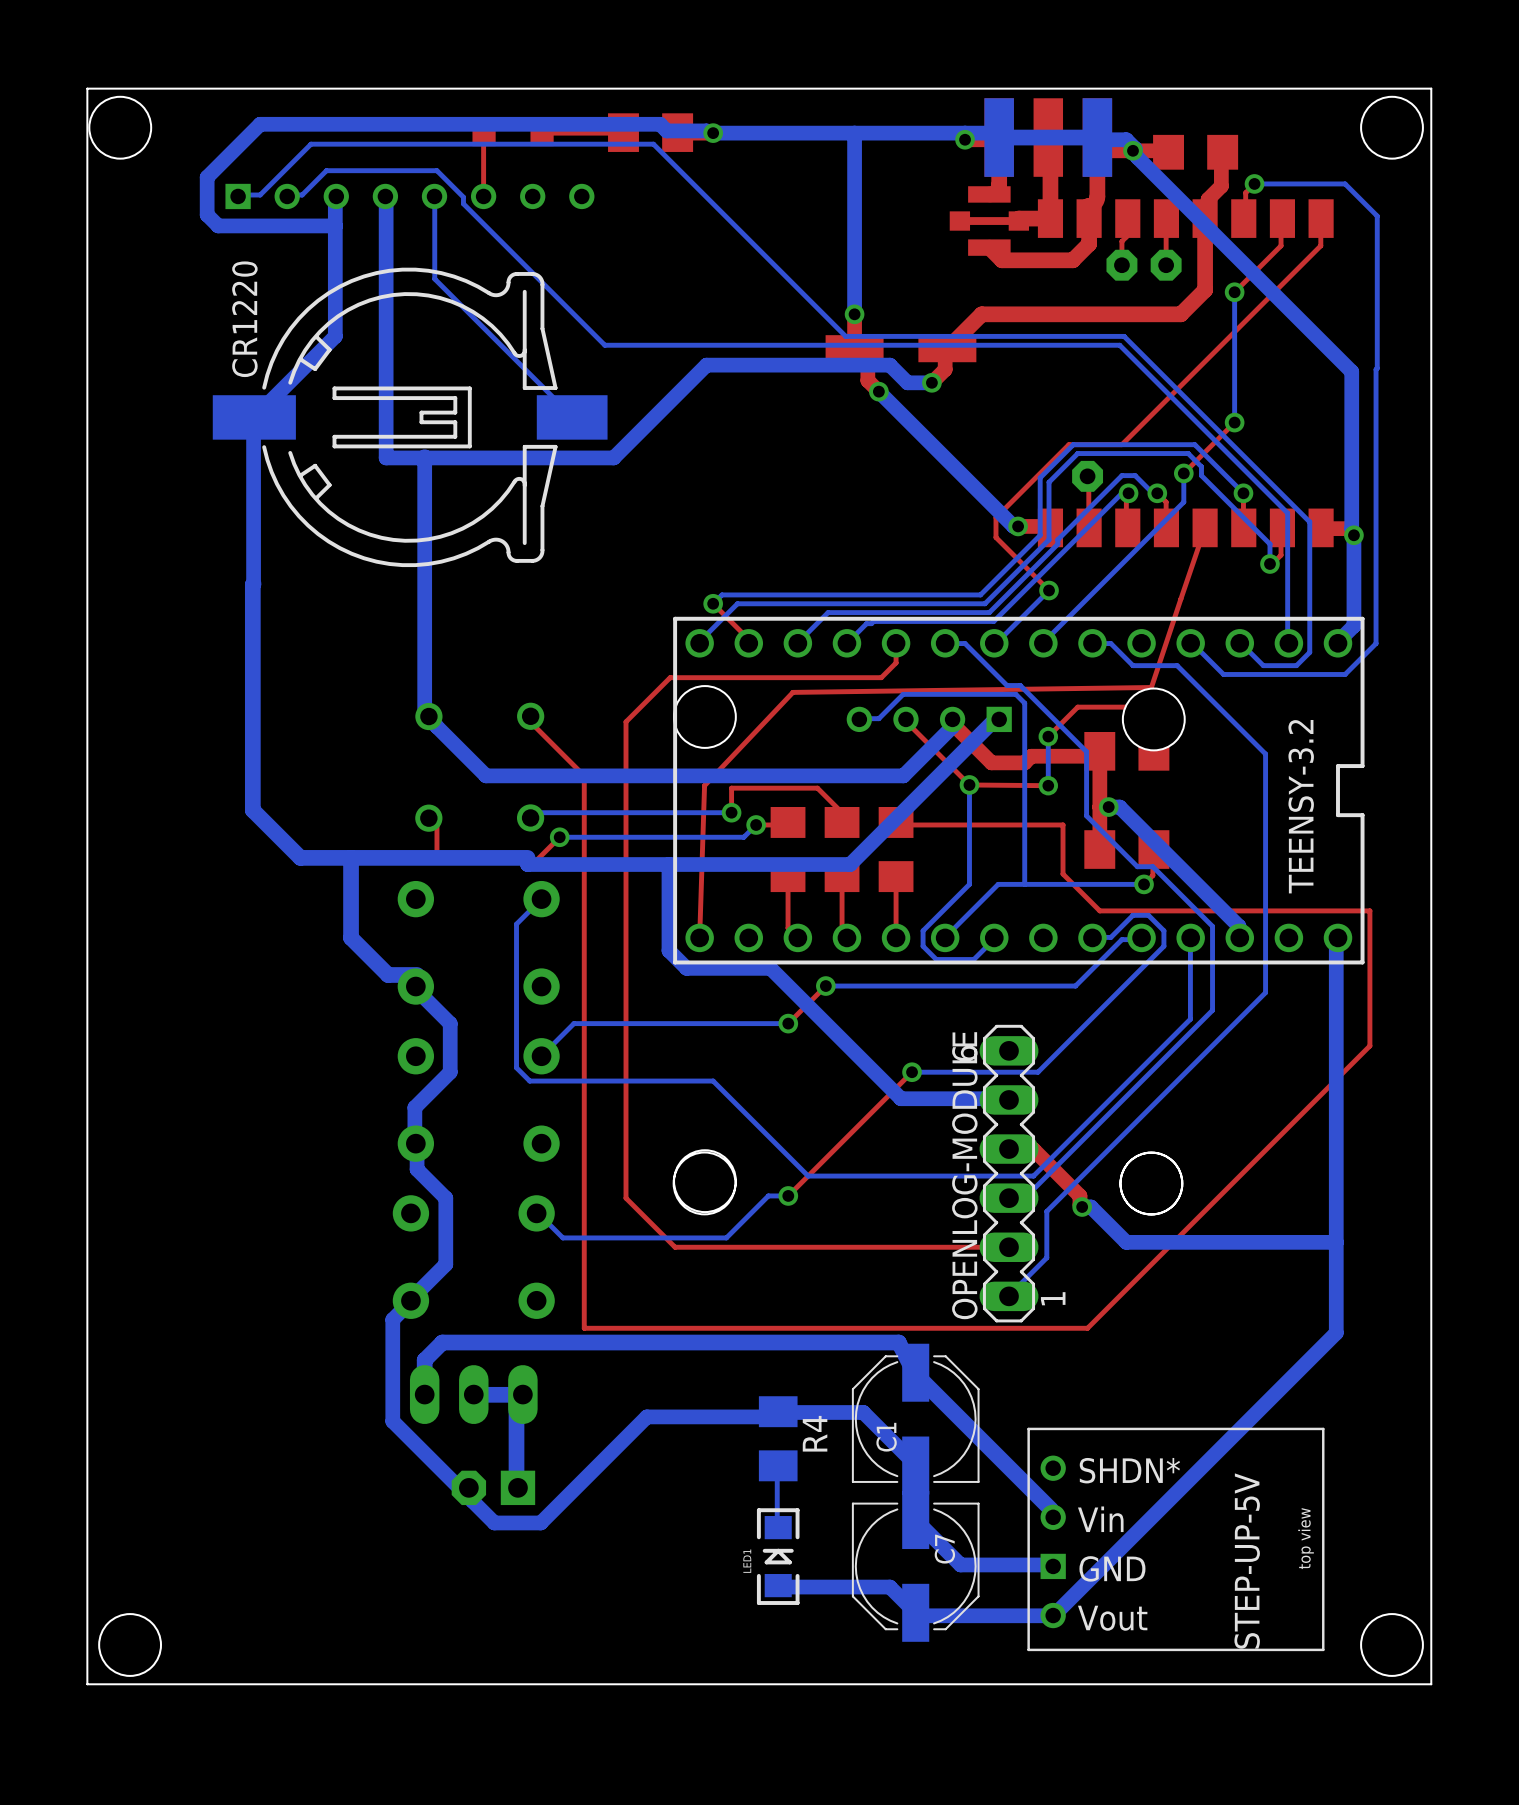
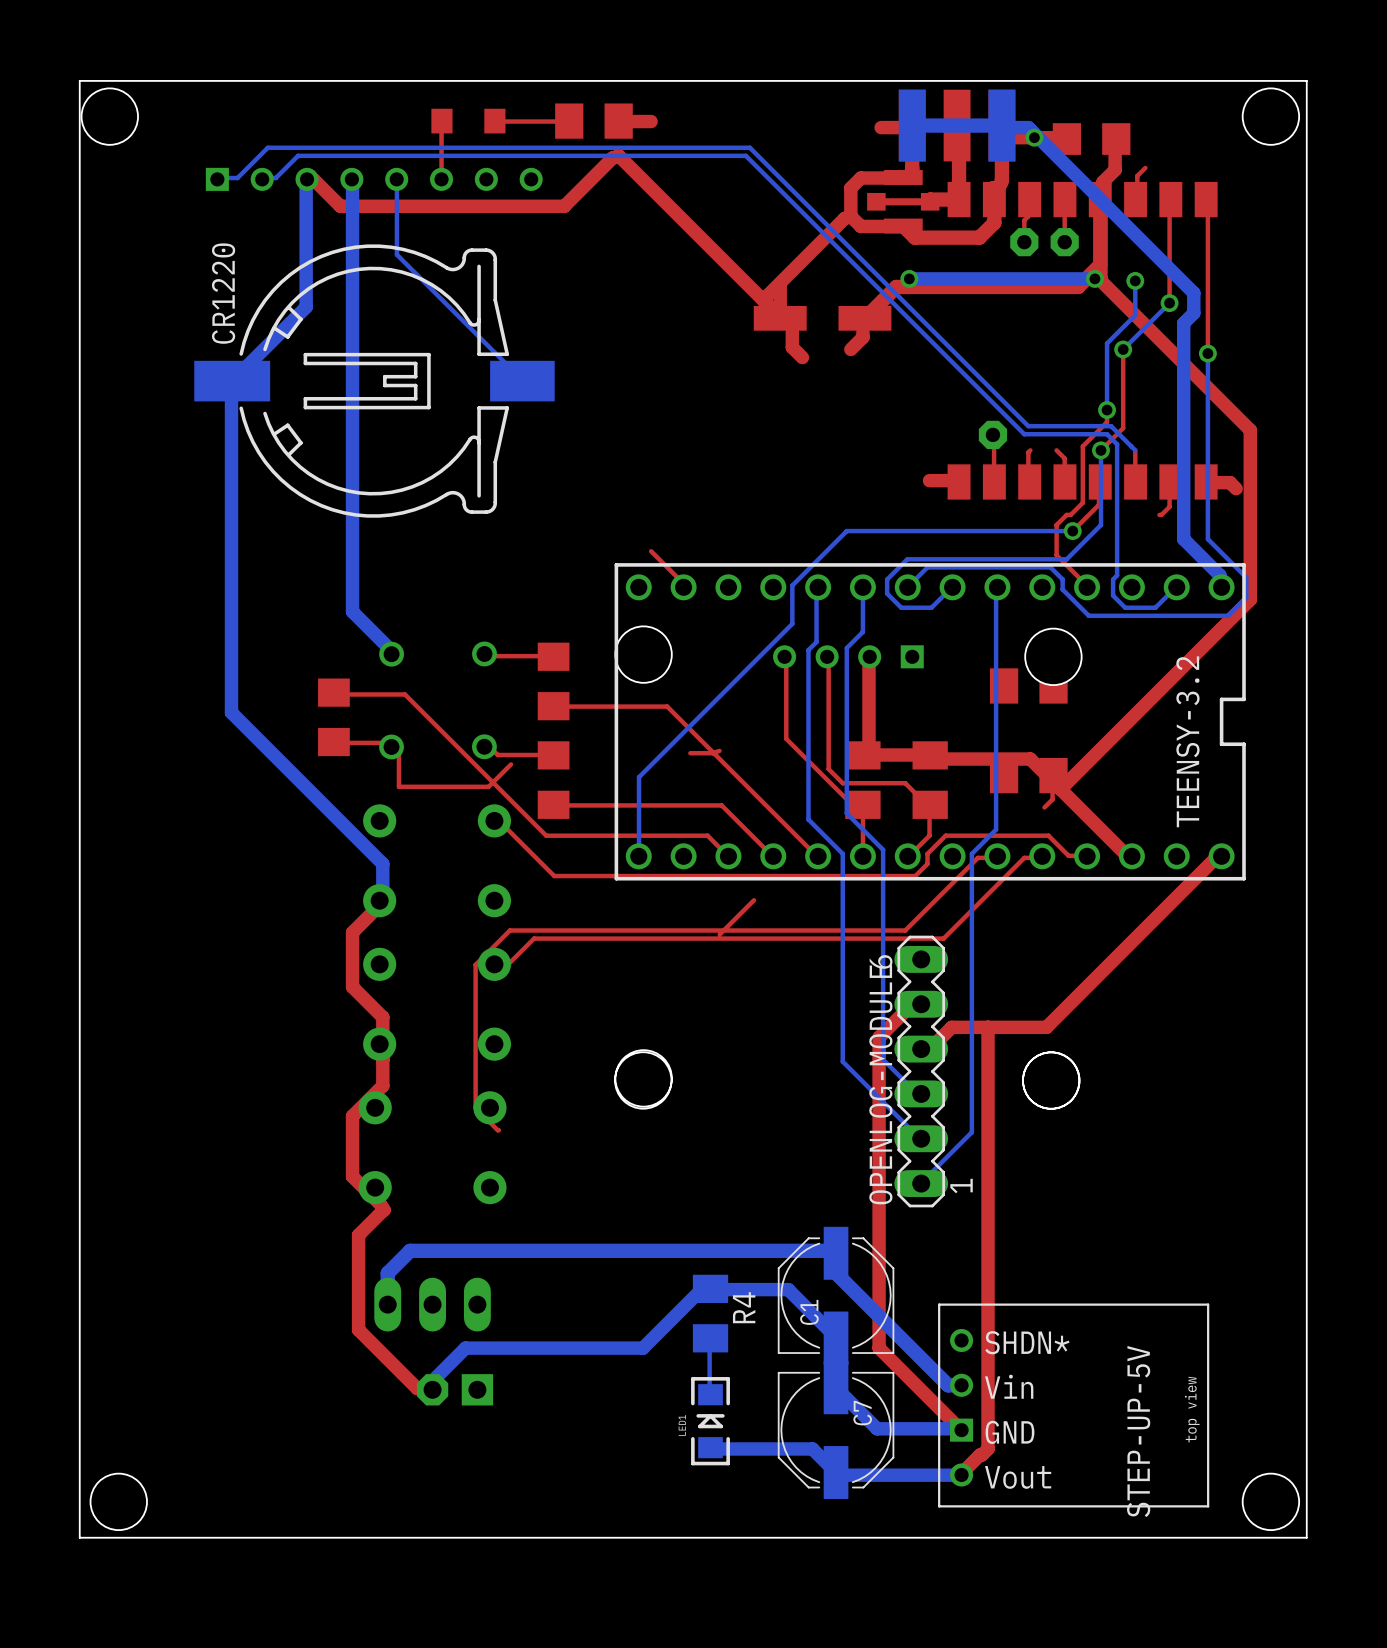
via: (713, 133) -> none
bottom track: (854, 133) (854, 314) -> none
bottom track: (999, 137) (993, 133) (713, 133) (706, 130) (666, 130) (660, 124) (260, 124) (207, 177) (207, 214) (218, 225) (335, 225) -> none
via: (965, 139) -> none
bottom track: (1135, 148) (1135, 150) (1132, 150) (1137, 157) (1351, 371) (1353, 625) (1337, 643) -> (1036, 135) (1193, 293) (1193, 313) (1183, 323) (1183, 539) (1220, 575) (1221, 587)
bottom track: (293, 161) (311, 144) (653, 144) (845, 336) (1124, 336) (1309, 522) (1309, 652) (1296, 665) (1265, 665) -> (267, 147) (749, 147) (1028, 426) (1111, 426)
bottom track: (436, 170) (463, 197) (463, 203) (604, 345) (1119, 345) (1287, 513) (1288, 643) -> (398, 155) (745, 155) (1024, 434)
bottom track: (1254, 183) (1345, 183) (1377, 216) (1376, 643) (1365, 654) -> (1207, 353) (1207, 539) (1246, 577) (1246, 597)
via: (1254, 183) -> none
top track: none -> (903, 177) (860, 178) (850, 188) (850, 216)
top track: none -> (307, 179) (314, 180) (340, 206) (564, 206) (612, 157) (618, 155) (780, 318)
top track: none -> (1100, 199) (1100, 280) (1250, 430) (1250, 599) (1060, 789)
top track: (1321, 218) (1320, 245) (1121, 444) (1068, 444) (995, 517) (995, 537) (1049, 590) -> (1206, 199) (1207, 200) (1207, 353)
top track: none -> (850, 216) (844, 218) (763, 300)
top track: none -> (850, 216) (860, 226) (903, 226)
top track: (1281, 245) (1234, 292) -> (1169, 224) (1169, 303)
bottom track: (1234, 292) (1234, 422) -> none
via position: (1234, 292) -> (1135, 280)
via: none -> (909, 278)
bottom track: none -> (1094, 278) (909, 278)
via: none -> (1094, 278)
bottom track: none -> (1135, 280) (1135, 315) (1107, 343) (1107, 410)
via: (854, 314) -> none
bottom track: none -> (1169, 303) (1123, 349)
via: none -> (1169, 303)
bottom track: (931, 382) (907, 382) (889, 365) (706, 365) (613, 457) (386, 457) -> (396, 654) (352, 611) (352, 418)
via: (931, 382) -> none
top track: none -> (1123, 349) (1123, 428) (1100, 450)
via: none -> (1123, 349)
via: none -> (1207, 353)
bottom track: (878, 391) (1013, 526) (1018, 526) -> none
via: (878, 391) -> none
top track: (1234, 422) (1183, 473) -> none
via: (1234, 422) -> none
top track: none -> (1107, 410) (1107, 422) (1082, 446) (1082, 502) (1056, 525) (1056, 555) (1087, 587)
via: none -> (1107, 410)
bottom track: (424, 456) (424, 714) (428, 716) (486, 775) (903, 775) (952, 726) (952, 719) (951, 720) (951, 727) -> none
bottom track: (1216, 466) (1194, 444) (1073, 444) (1040, 477) (1040, 535) (980, 594) (722, 594) (713, 603) -> none
bottom track: (1183, 473) (1183, 502) (1043, 643) -> (901, 607) (931, 607) (952, 587)
via: (1183, 473) -> none
bottom track: (1121, 475) (1057, 539) (1057, 544) (989, 612) (828, 612) (797, 643) -> none
bottom track: (1135, 475) (1152, 493) (1157, 493) -> none
bottom track: (1128, 493) (1121, 493) (993, 621) (873, 621) (866, 623) (846, 643) -> none
via: (1128, 493) -> none
via: (1157, 493) -> none
via: none -> (1100, 450)
via: (1243, 493) -> none
via: (1018, 526) -> none
top track: (1205, 527) (1151, 687) (792, 692) (704, 785) (699, 937) -> (1100, 481) (1098, 504) (1072, 531)
via: (1353, 535) -> none
bottom track: (1269, 564) (1269, 544) (1201, 475) (1201, 466) (1188, 453) (1077, 453) (1049, 482) (1049, 539) (984, 603) (737, 603) (699, 643) -> none
via: (1269, 564) -> none
bottom track: none -> (1072, 531) (846, 531) (792, 585) (792, 623) (639, 777) (638, 856)
via: none -> (1072, 531)
bottom track: (253, 583) (252, 810) (300, 857) (527, 857) (527, 864) (850, 864) (993, 720) (999, 719) -> (231, 533) (231, 712) (382, 863) (384, 900)
bottom track: (1049, 590) (994, 643) -> (1117, 615) (1088, 615) (1062, 589) (1062, 579) (1050, 567) (927, 567) (907, 587)
via: (1049, 590) -> none
via: (713, 603) -> none
top track: (896, 643) (896, 662) (881, 677) (670, 677) (626, 721) (626, 1198) (675, 1247) (1009, 1247) -> none
bottom track: (945, 643) (965, 643) (971, 650) -> (1100, 450) (1100, 525) (1066, 559) (907, 559) (887, 579) (887, 593)
bottom track: (1092, 643) (1110, 643) (1132, 665) (1177, 665) (1265, 754) (1265, 992) (1046, 1211) (1046, 1257) -> (997, 587) (996, 829) (971, 853) (971, 1132) (955, 1148)
bottom track: (1190, 643) (1223, 674) -> none
bottom track: (1239, 643) (1263, 665) -> (1036, 434) (1107, 434) (1117, 444) (1117, 575) (1113, 579) (1113, 595) (1125, 607) (1153, 607)
bottom track: none -> (1176, 587) (1155, 607)
bottom track: (987, 665) (1007, 685) (1020, 685) (1086, 751) (1086, 815) (1137, 866) (1152, 866) (1212, 926) (1212, 1010) (1024, 1198) (1009, 1198) -> (862, 587) (862, 631) (846, 648) (846, 813) (883, 849) (883, 1059) (917, 1093) (921, 1093)
bottom track: (894, 703) (903, 694) (1015, 694) (1024, 703) (1024, 884) -> (816, 642) (816, 587) (818, 587)
bottom track: (885, 712) (878, 718) (859, 719) -> none
top track: (530, 716) (535, 726) (584, 775) (584, 1328) (1087, 1328) (1369, 1045) (1369, 910) (1099, 910) (1063, 874) (1063, 824) (903, 824) (896, 822) -> none
top track: none -> (488, 653) (491, 656) (553, 656)
top track: none -> (784, 656) (786, 658) (786, 738) (852, 805) (862, 804) (862, 856)
top track: (952, 719) (954, 725) (991, 762) (1024, 762) (1031, 756) (1093, 756) (1099, 751) (1099, 849) -> (869, 656) (868, 748) (862, 755) (929, 755) (935, 759) (1030, 759) (1127, 855) (1131, 856)
top track: (907, 720) (969, 784) (1048, 785) -> (828, 658) (828, 769) (842, 783) (905, 783) (927, 805) (930, 804) (929, 835) (907, 856)
top track: (1048, 736) (1077, 707) (1136, 707) (1151, 721) (1151, 748) (1153, 751) -> none
bottom track: (1048, 736) (1048, 785) -> none
via: (1048, 736) -> none
part: none -> (553, 681)
bottom track: (969, 784) (969, 884) (923, 930) (923, 935) -> (808, 650) (808, 819) (842, 853)
via: (969, 784) -> none
part: none -> (333, 717)
via: (1048, 785) -> none
bottom track: (1108, 807) (1119, 807) (1239, 926) (1239, 937) -> none
via: (1108, 807) -> none
top track: none -> (333, 742) (390, 742) (396, 746)
top track: (731, 812) (731, 788) (817, 788) (842, 812) (842, 822) -> none
bottom track: (731, 812) (535, 812) (530, 817) -> none
via: (731, 812) -> none
top track: none -> (488, 746) (497, 755) (553, 755)
bottom track: (756, 824) (743, 837) (559, 837) -> none
via: (756, 824) -> none
via: (559, 837) -> none
part: (788, 849) -> none
part: (842, 849) -> none
part: (896, 849) -> none
part: none -> (553, 780)
part: none -> (862, 780)
part: none -> (930, 780)
bottom track: (351, 857) (351, 937) (388, 974) (417, 974) (415, 986) (419, 992) (450, 1023) (450, 1072) (414, 1107) (417, 1169) (445, 1198) (445, 1264) (392, 1319) (392, 1421) (459, 1487) (468, 1487) (472, 1494) (472, 1500) (494, 1522) (540, 1522) (646, 1416) (772, 1416) (778, 1411) -> (432, 1389) (433, 1380) (465, 1348) (643, 1348) (703, 1287) (710, 1288)
bottom track: (668, 864) (668, 950) (686, 968) (770, 968) (900, 1098) (1009, 1099) -> none
top track: (788, 876) (788, 928) (797, 937) -> (333, 692) (334, 694) (405, 694) (546, 835) (707, 835) (728, 856)
top track: (842, 876) (842, 933) (846, 937) -> (553, 804) (721, 805) (773, 856)
top track: (896, 876) (896, 937) -> (553, 706) (667, 706) (818, 856)
bottom track: (1144, 884) (998, 884) (945, 937) -> none
via: (1144, 884) -> none
bottom track: (541, 899) (516, 924) (516, 1067) (529, 1081) (713, 1081) (808, 1176) (1033, 1176) (1190, 1019) (1190, 937) -> none
top track: none -> (498, 820) (554, 876) (915, 876) (927, 863) (927, 853) (945, 835) (1048, 835) (1068, 855) (1087, 856)
bottom track: (994, 937) (973, 959) (936, 959) (923, 946) -> (921, 1138) (842, 1061) (842, 863)
top track: none -> (997, 856) (977, 857) (905, 930) (509, 930) (475, 964) (475, 1108) (498, 1130)
bottom track: (1092, 937) (1110, 937) (1132, 915) (1148, 915) (1163, 930) (1163, 946) (1037, 1072) (912, 1072) -> none
top track: none -> (1042, 856) (1024, 857) (943, 938) (534, 938) (498, 973)
bottom track: (1141, 937) (1139, 939) (1121, 939) (1075, 986) (825, 986) -> none
bottom track: (1337, 937) (1336, 939) (1336, 1332) (1053, 1615) -> none
top track: none -> (384, 900) (352, 932) (352, 987) (382, 1017) (384, 1053) (382, 1085) (352, 1116) (352, 1176) (384, 1210) (358, 1235) (358, 1329) (417, 1388) (432, 1389)
via: (825, 986) -> none
bottom track: (788, 1023) (573, 1023) (541, 1056) -> none
via: (788, 1023) -> none
top track: (912, 1072) (788, 1195) -> none
via: (912, 1072) -> none
top track: none -> (921, 1004) (911, 1005) (879, 1037) (879, 1348) (961, 1430)
top track: none -> (988, 1027) (988, 1448) (961, 1474)
top track: (1009, 1149) (1033, 1149) (1079, 1195) (1079, 1204) (1082, 1207) -> (921, 1049) (921, 1047) (931, 1047) (951, 1027) (1046, 1027) (1215, 857) (1221, 856)
bottom track: (788, 1195) (768, 1195) (726, 1237) (562, 1237) (536, 1213) -> none
via: (788, 1195) -> none
bottom track: (1082, 1207) (1091, 1207) (1126, 1242) (1336, 1242) -> none
via: (1082, 1207) -> none
bottom track: (430, 1392) (424, 1394) (424, 1360) (442, 1342) (898, 1342) (914, 1372) (1051, 1509) (1051, 1516) (1053, 1517) -> (387, 1304) (387, 1273) (410, 1250) (833, 1250) (836, 1253) (836, 1273) (948, 1385) (961, 1385)
bottom track: (473, 1394) (522, 1394) (516, 1397) (517, 1487) -> none
part position: (473, 1394) -> (432, 1304)
part position: (493, 1487) -> (454, 1389)

